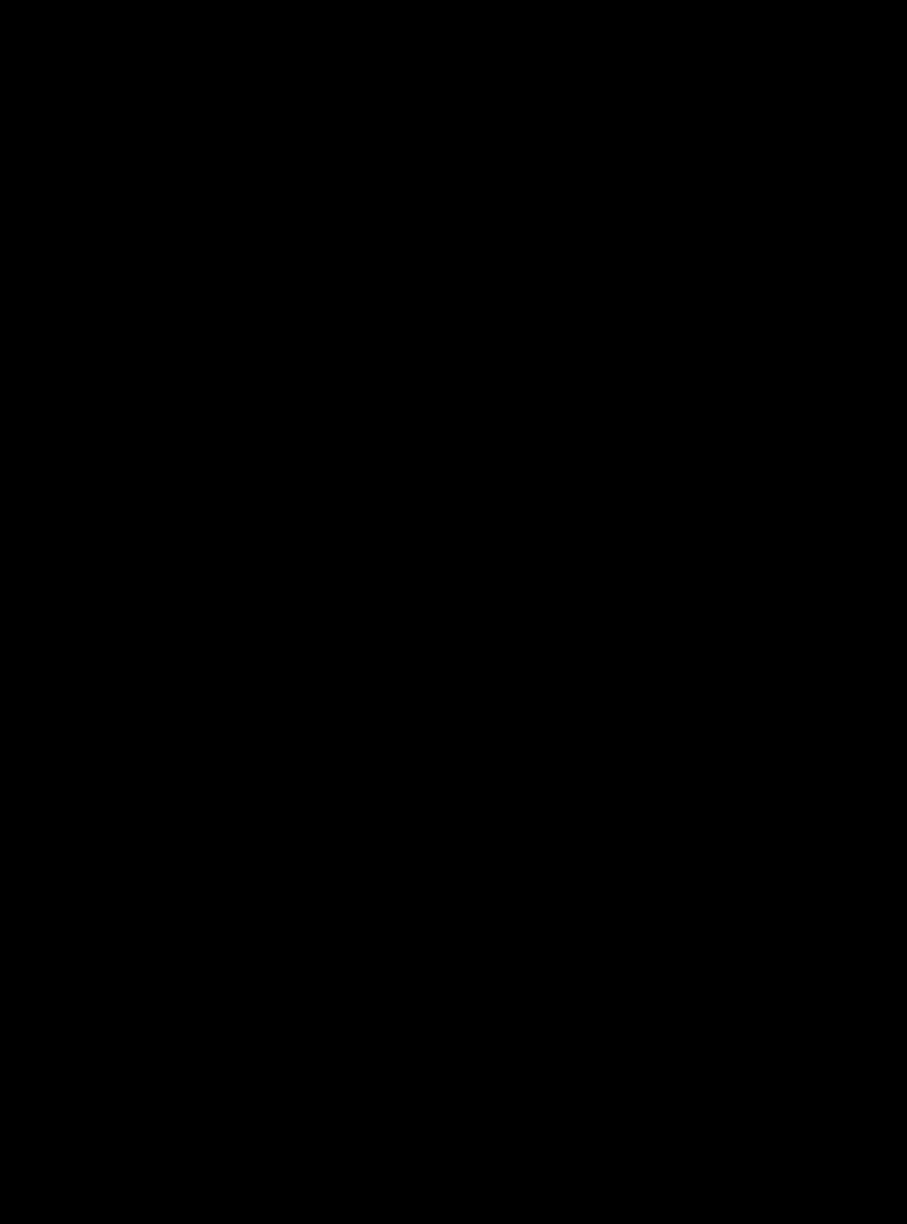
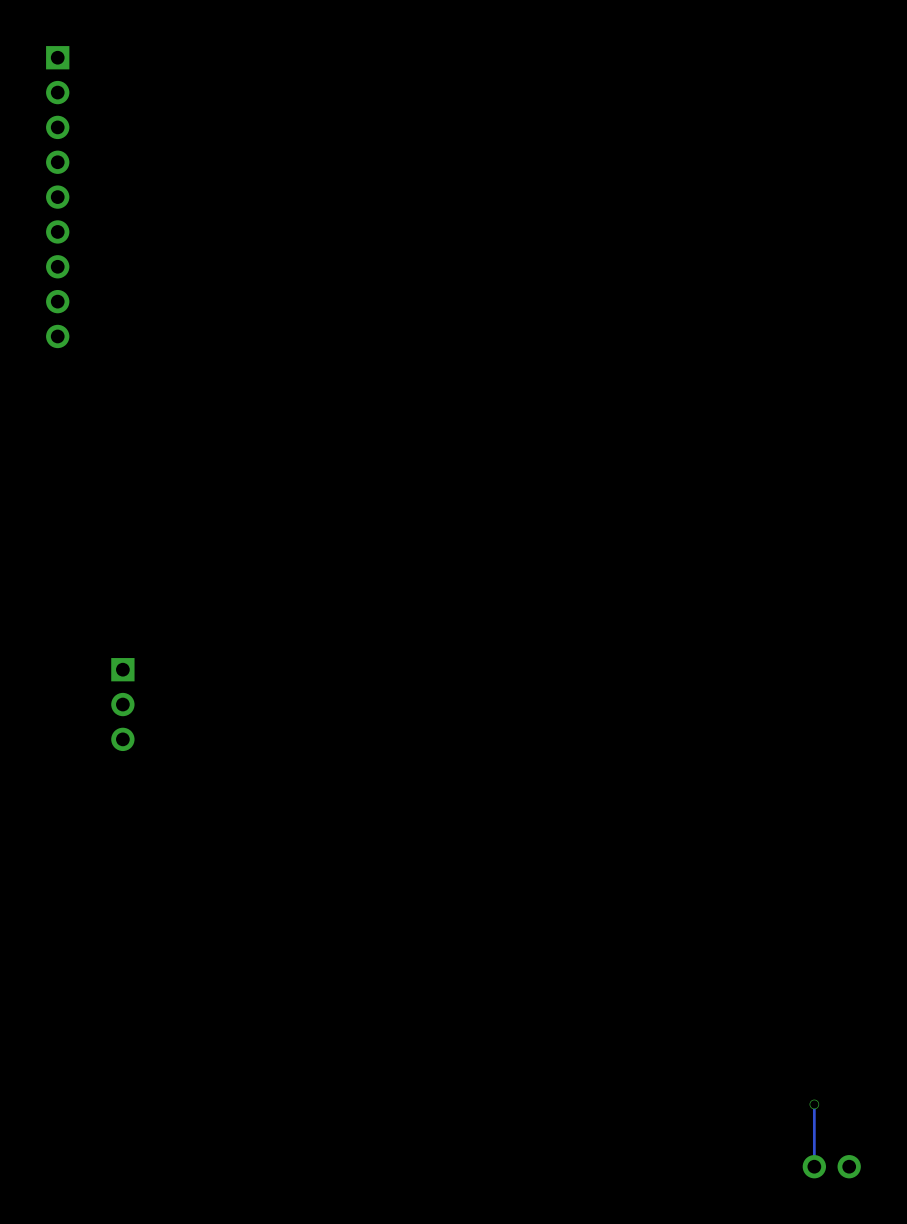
part: none -> (57, 197)
part: none -> (122, 704)
part: none -> (831, 1138)

